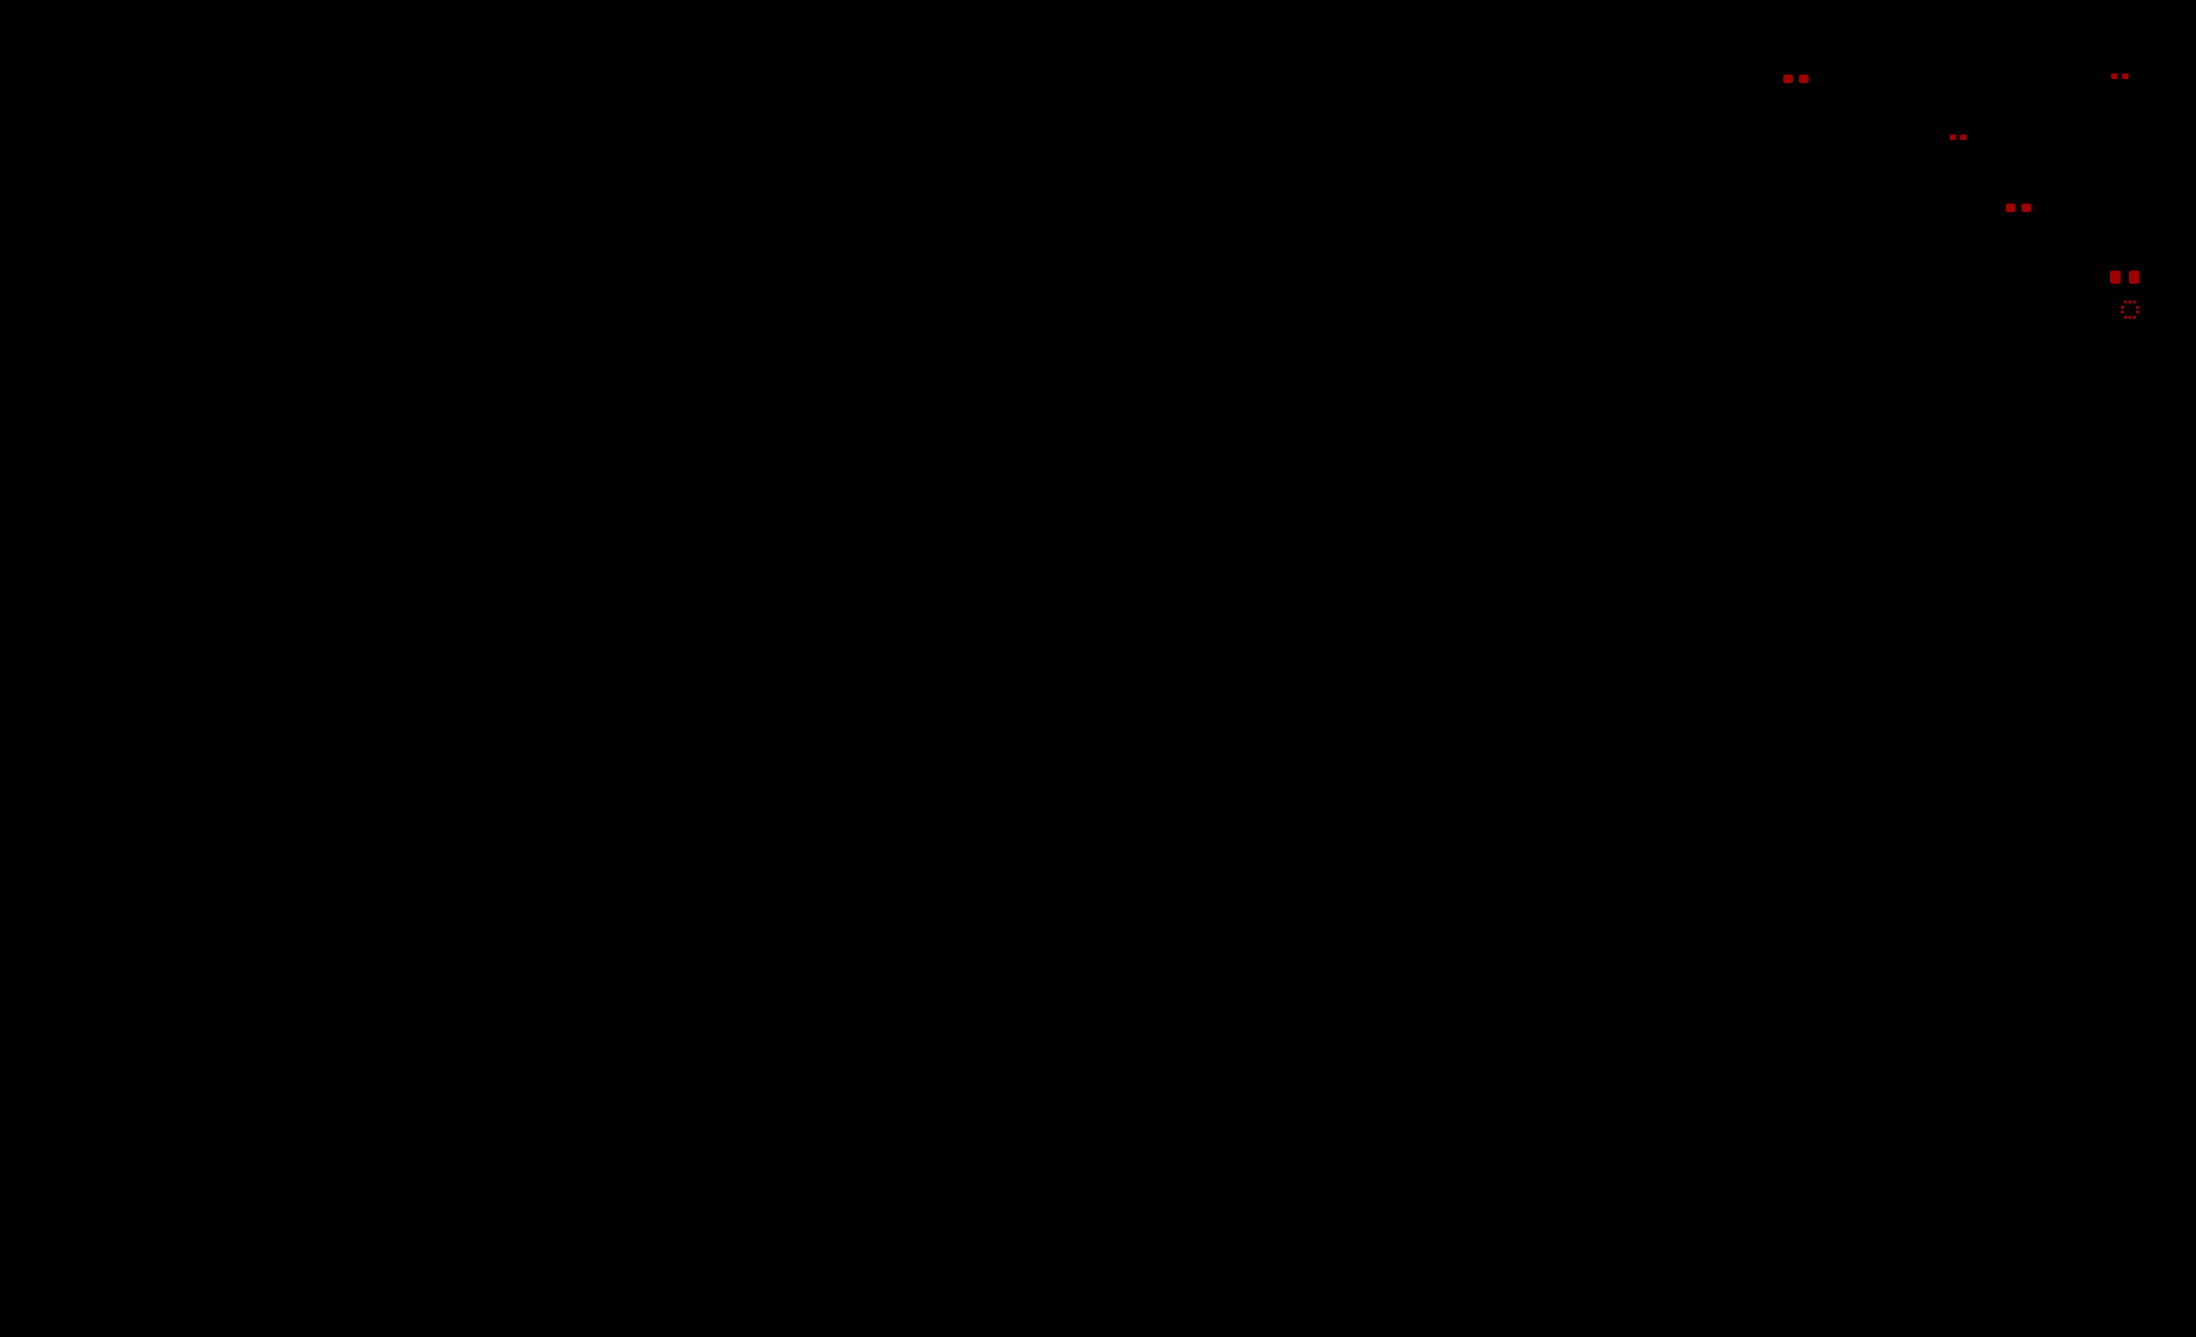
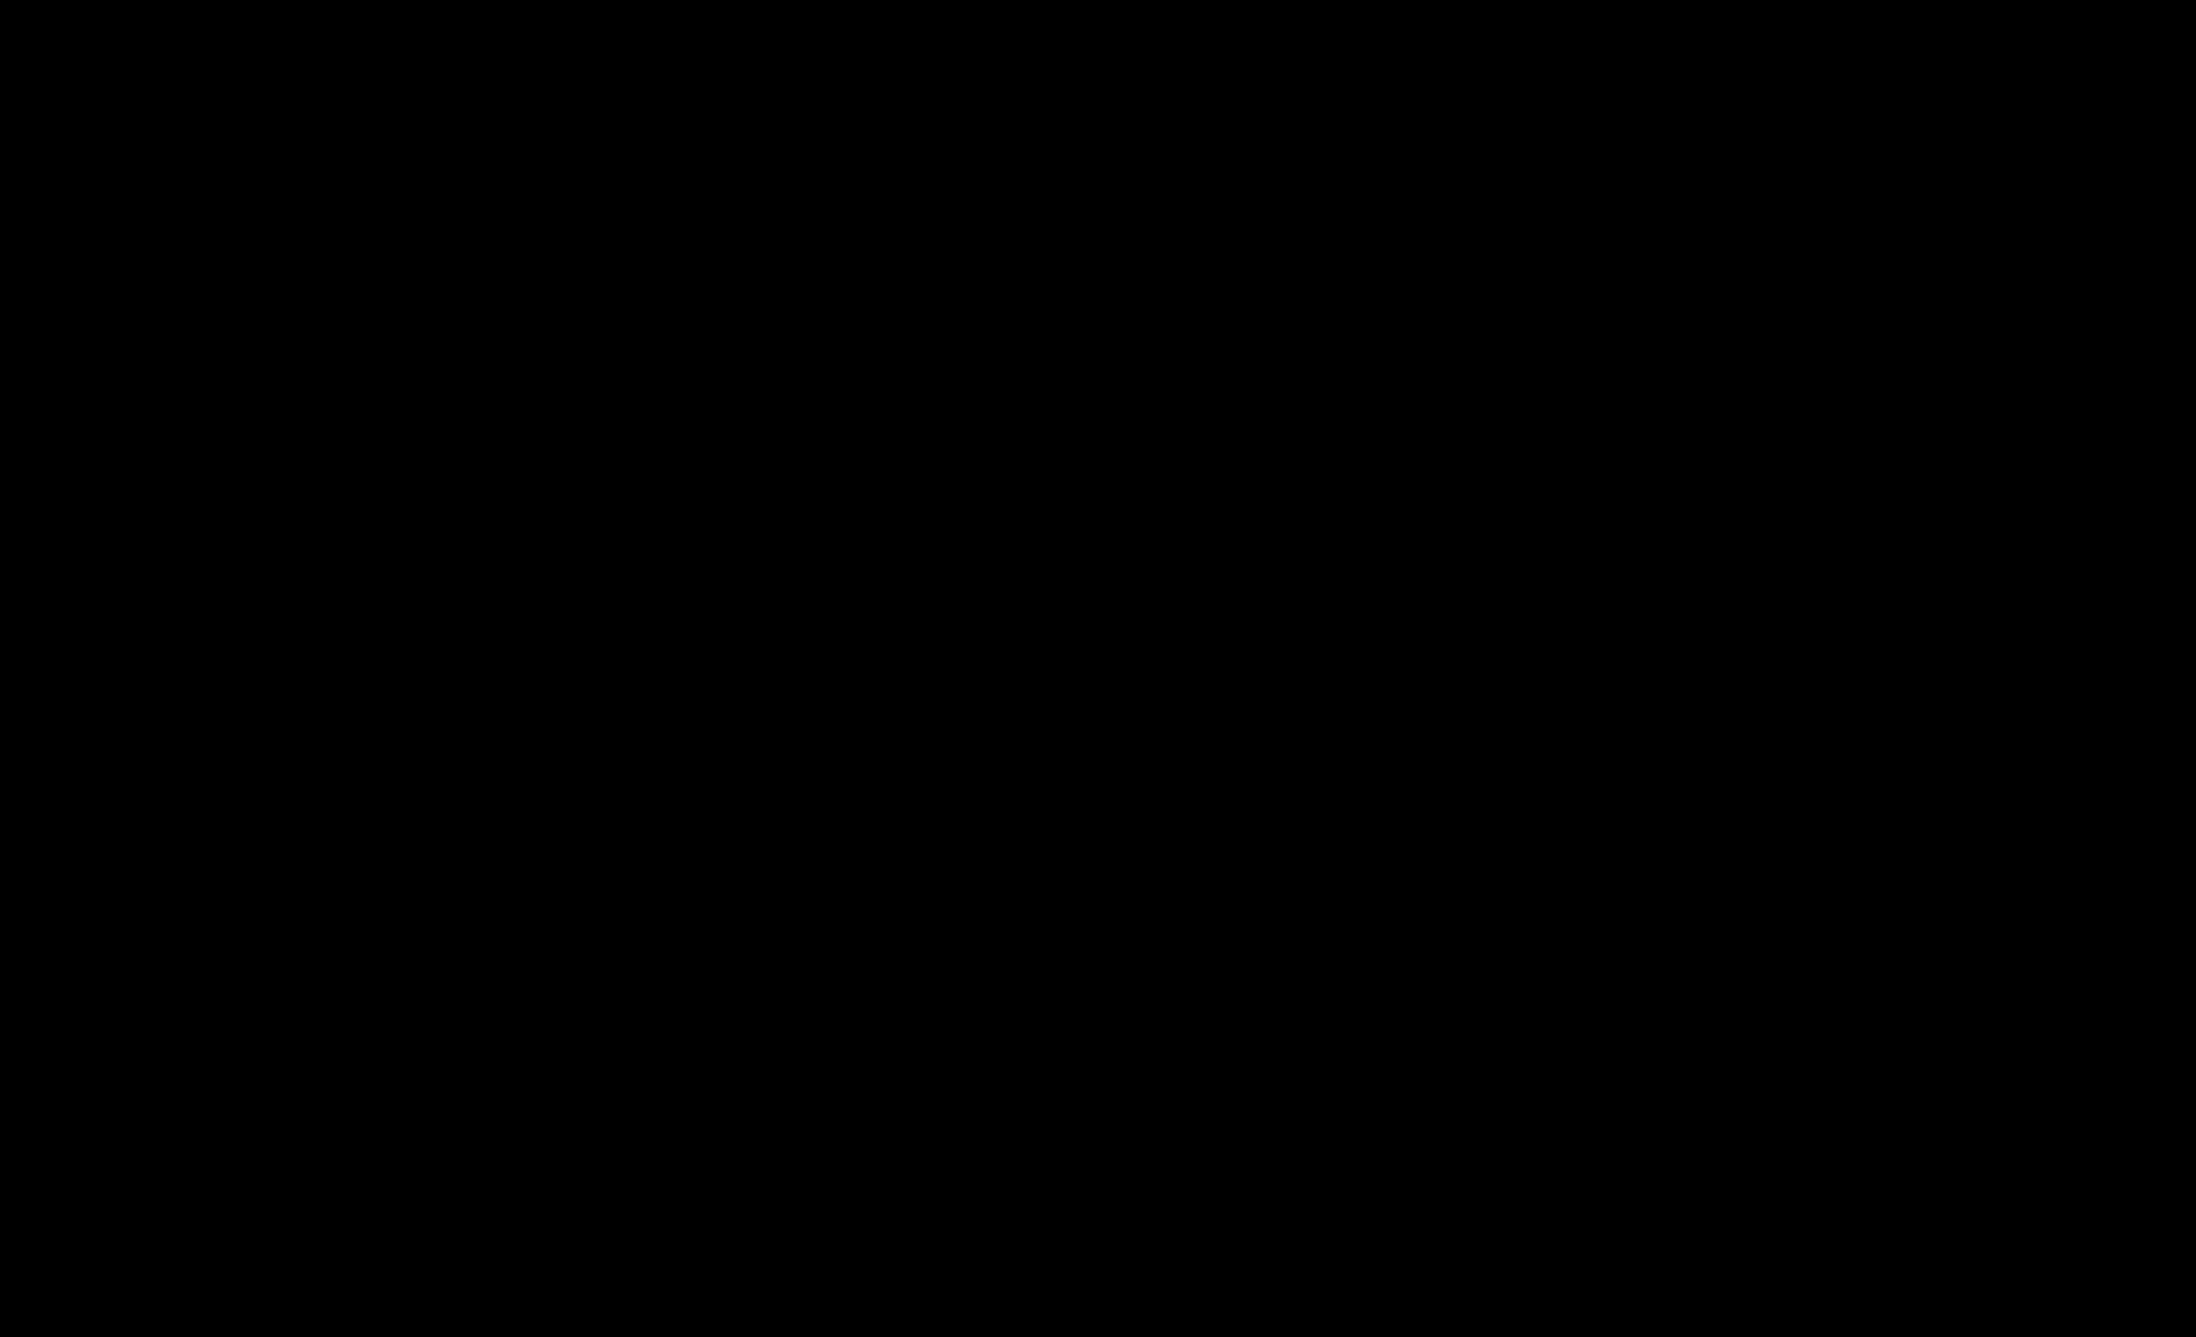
part: (2119, 76) -> none
part: (1795, 78) -> none
part: (1958, 137) -> none
part: (2018, 207) -> none
part: (2124, 277) -> none
part: (2130, 309) -> none

